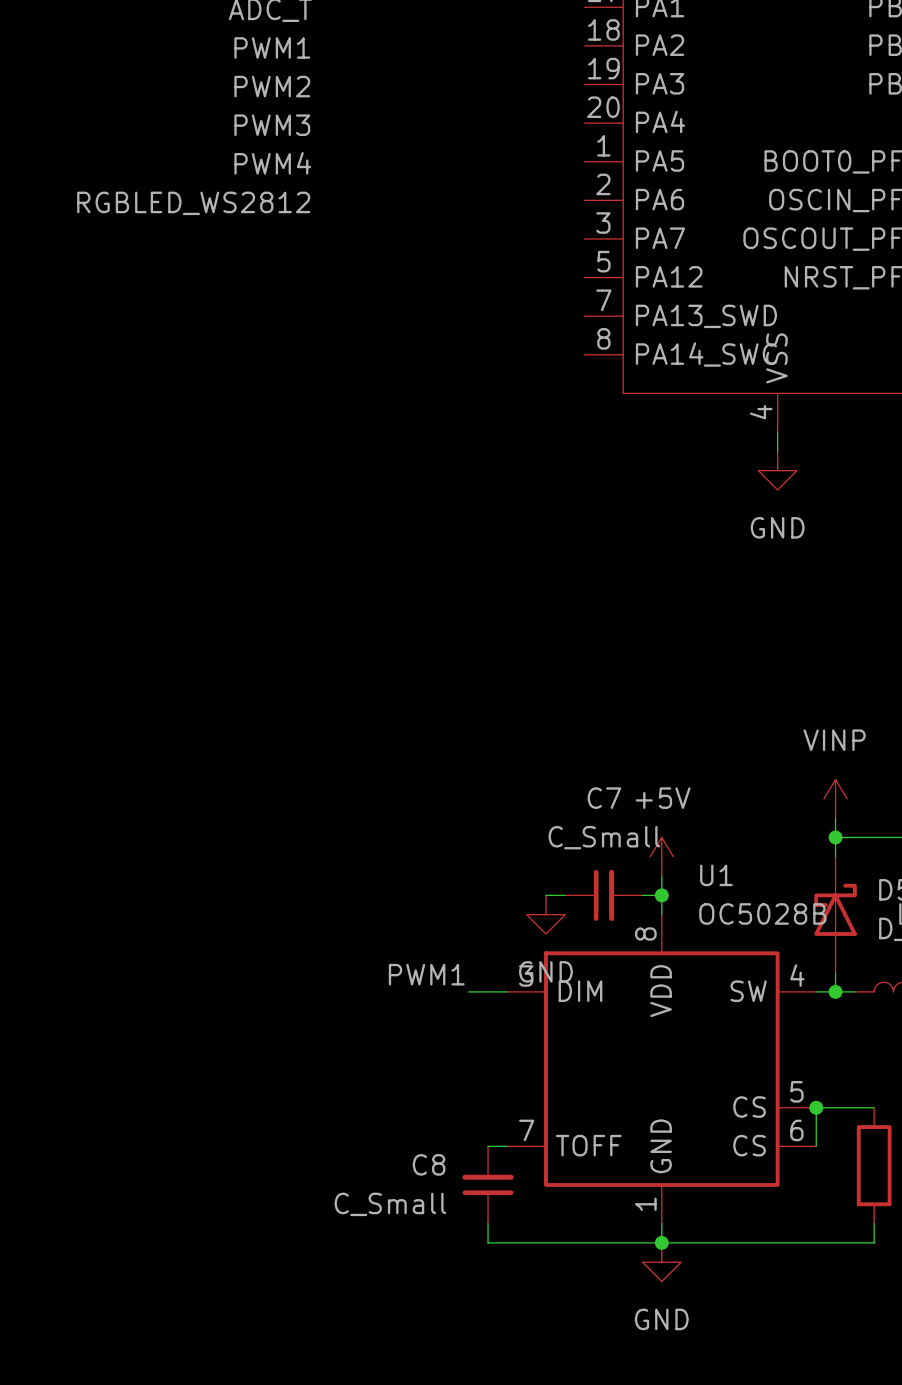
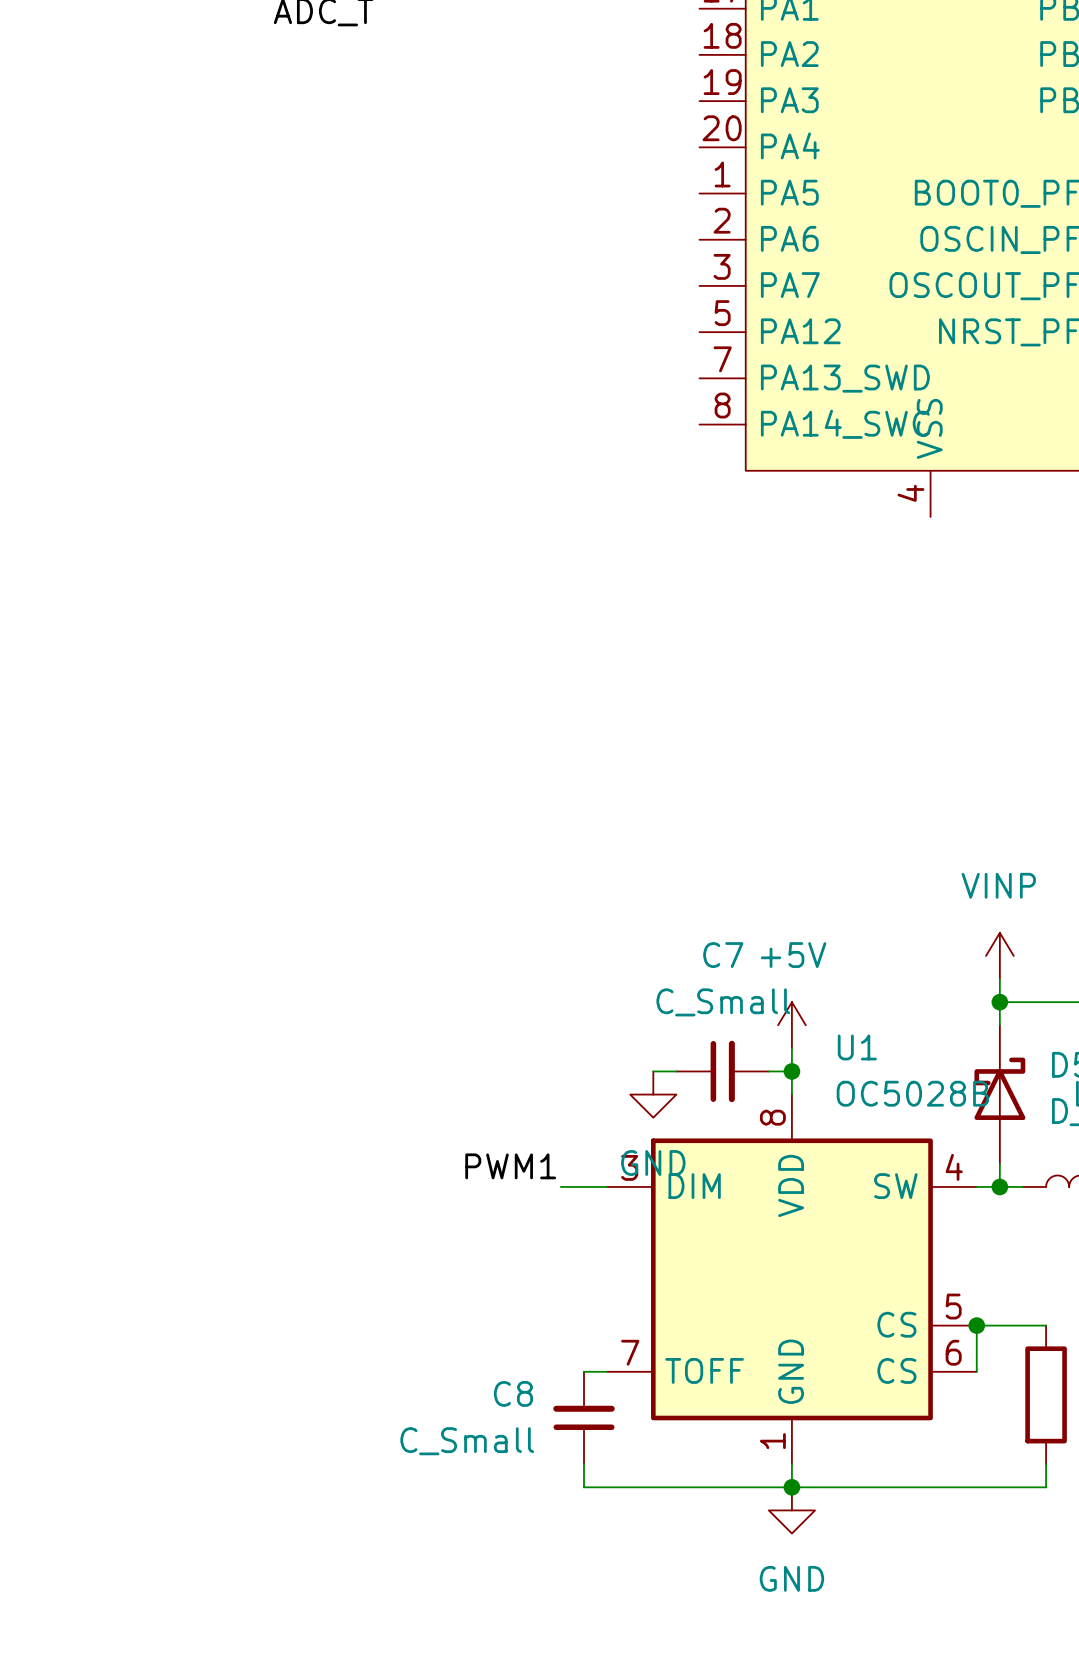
label: PWM1 (272, 47) -> none
label: PWM2 (272, 86) -> none
label: PWM3 (272, 125) -> none
label: PWM4 (272, 163) -> none
label: RGBLED_WS2812 (193, 203) -> none
wire: (777, 432) (777, 451) -> none
power symbol: GND (777, 470) -> none

